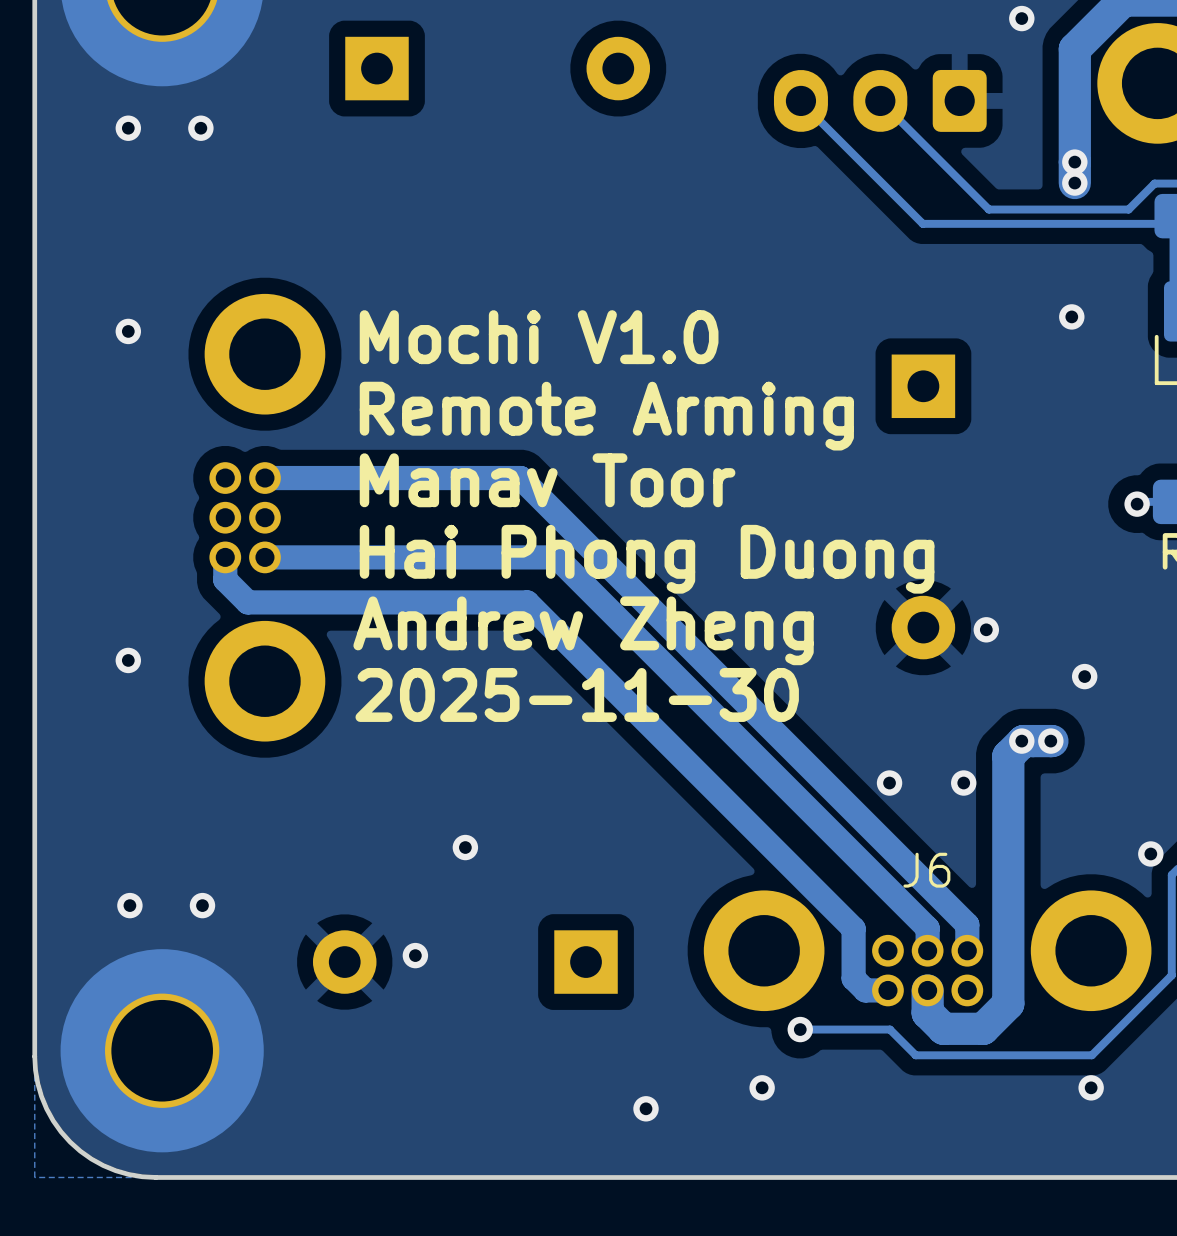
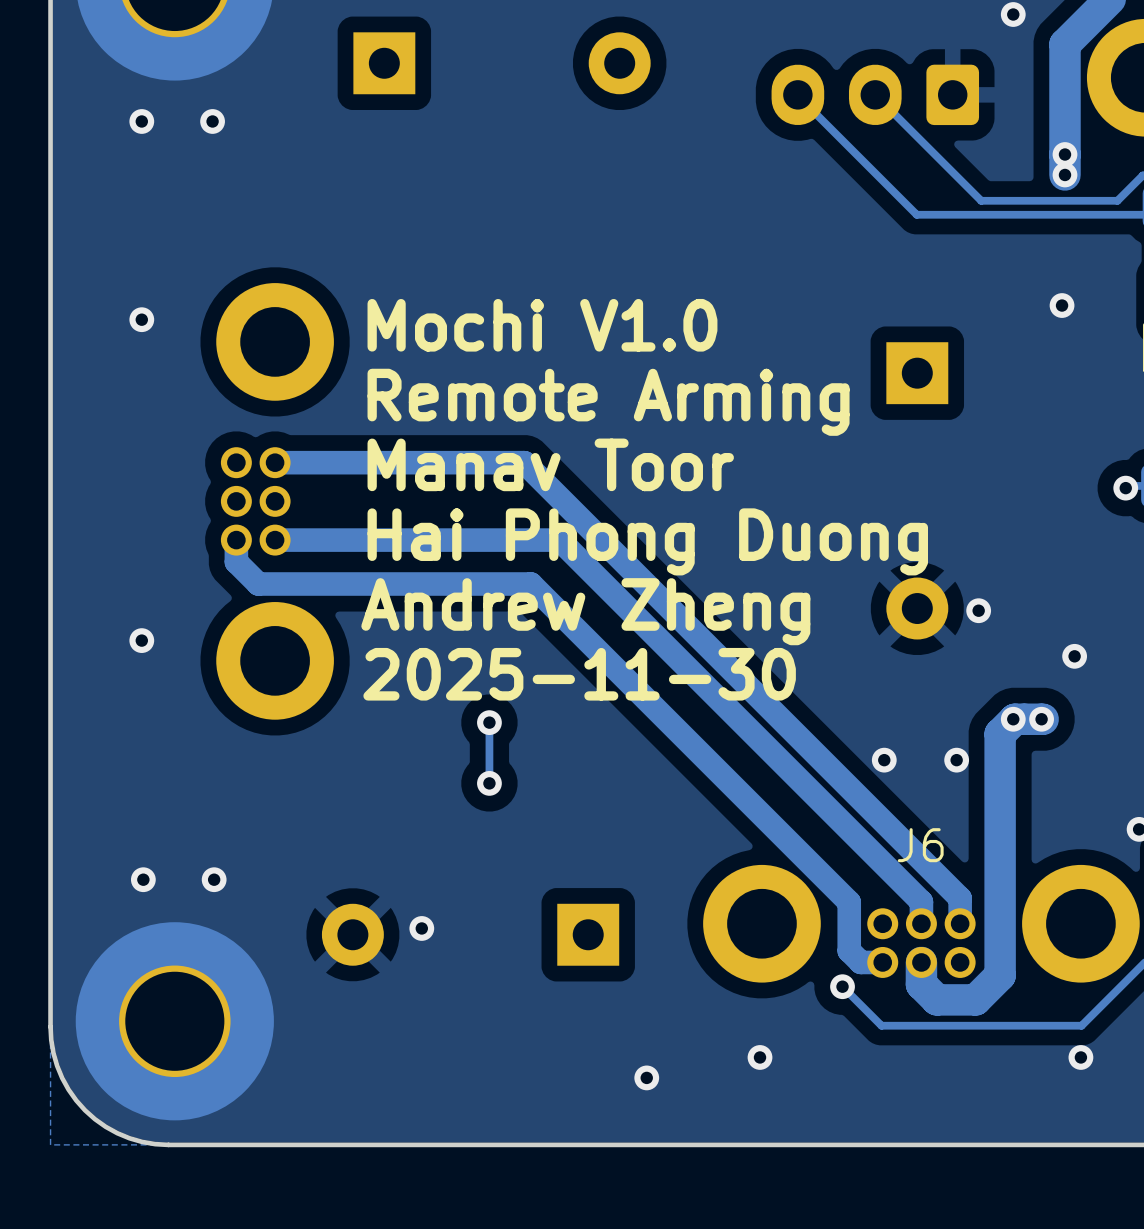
track: none -> (489, 722) (489, 783)
via: none -> (489, 722)
via position: (465, 847) -> (489, 783)
track: (800, 1029) (889, 1029) (915, 1055) -> (843, 986) (881, 1025) (909, 1025)
via position: (800, 1029) -> (842, 986)

